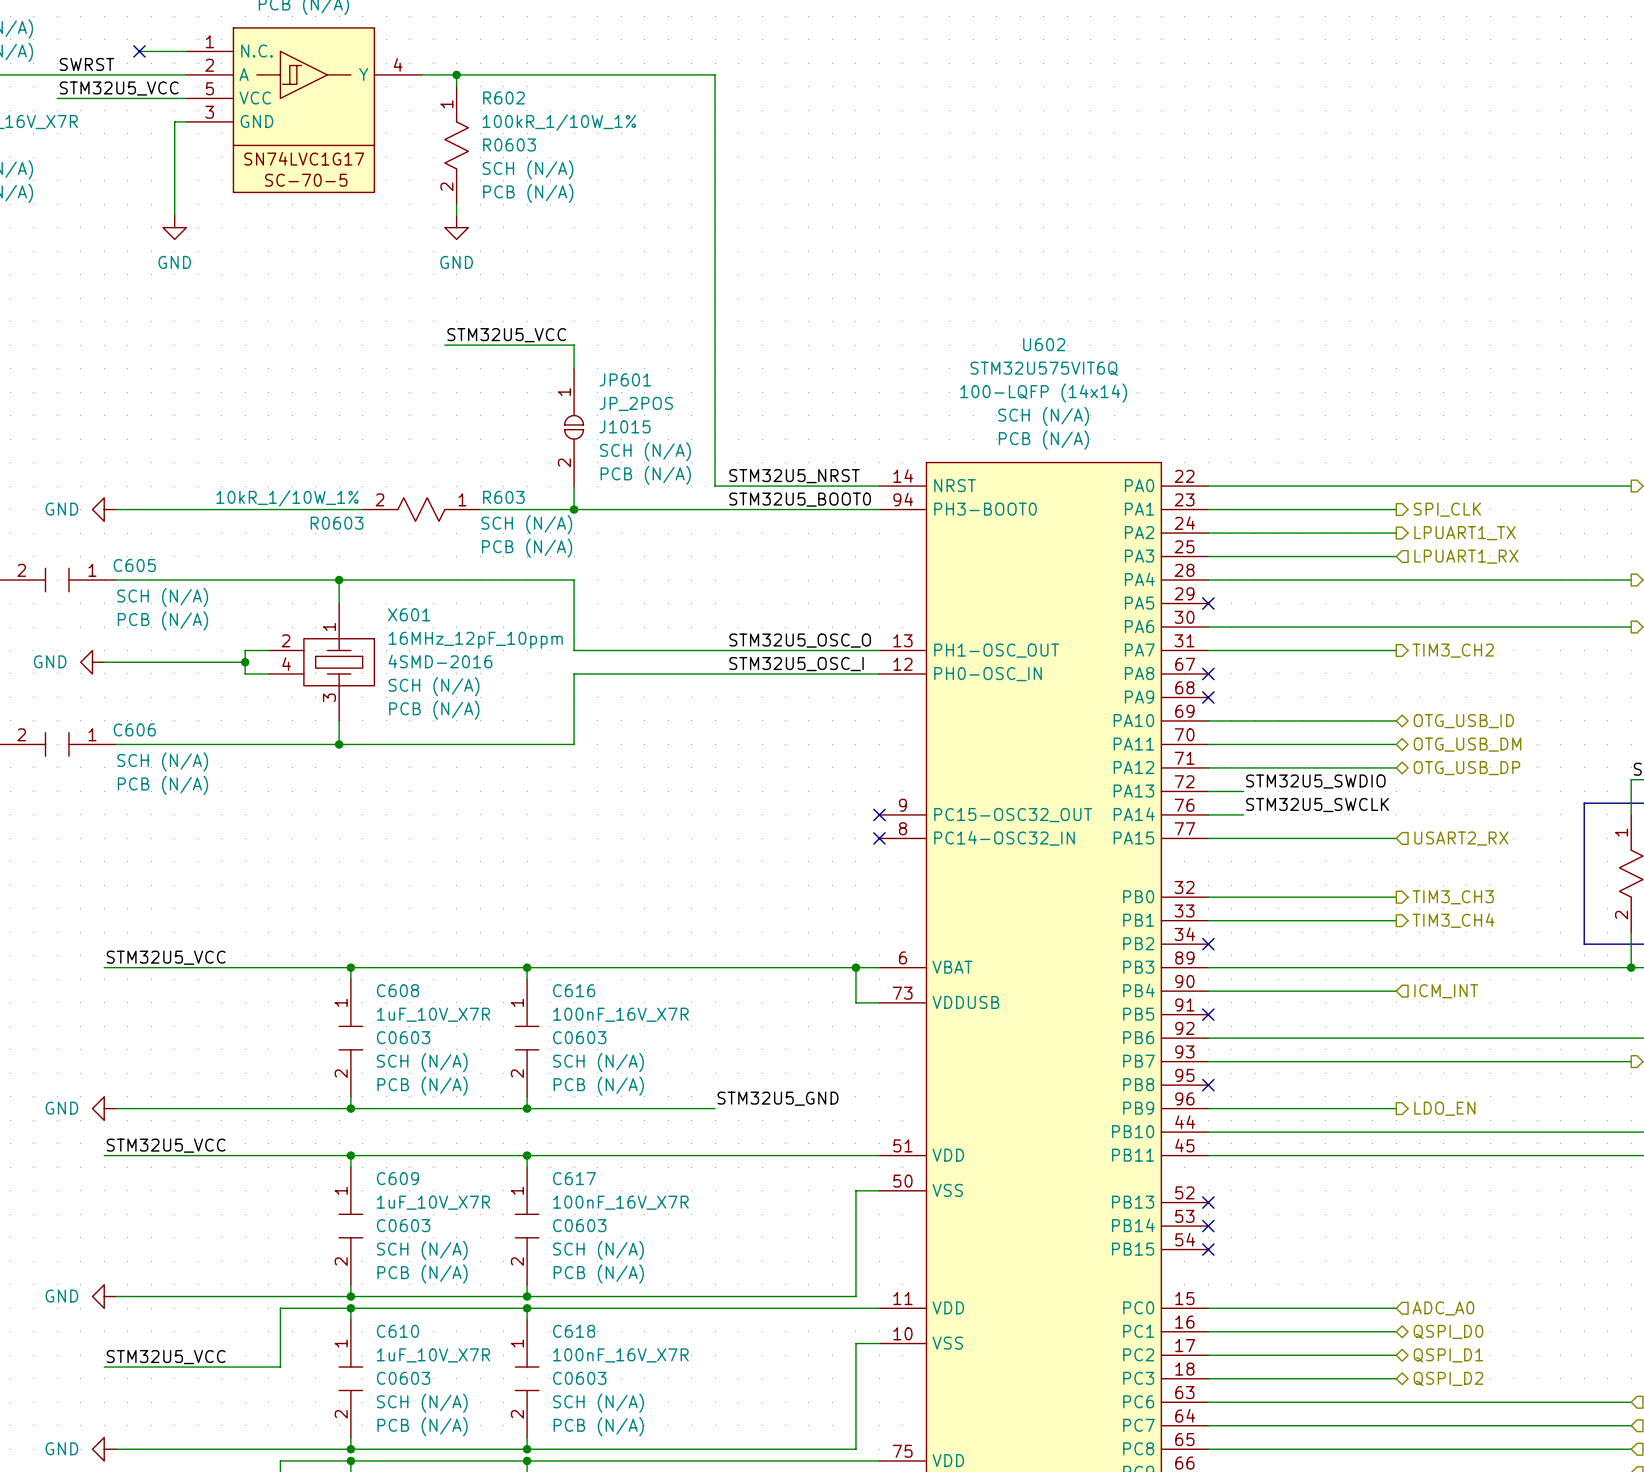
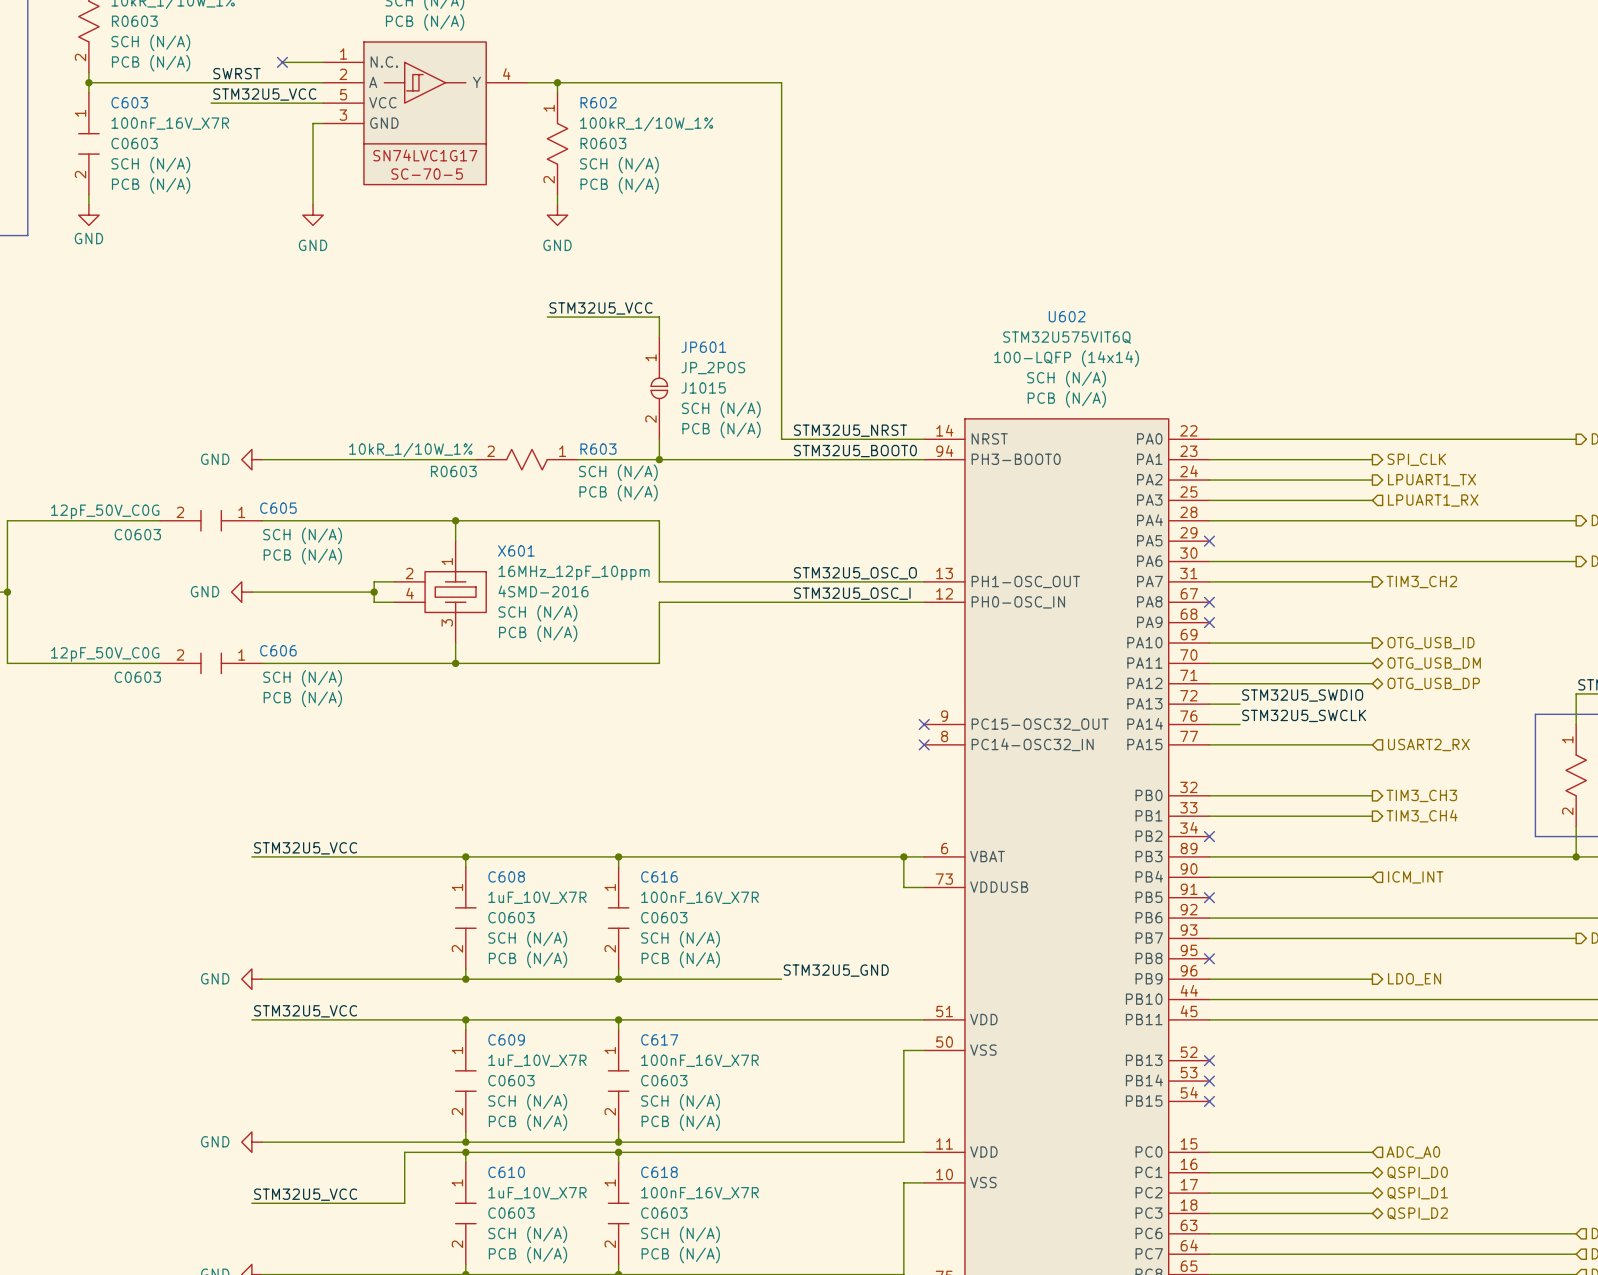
hierarchical label shape: bidirectional (1463, 721) -> output (1431, 643)

